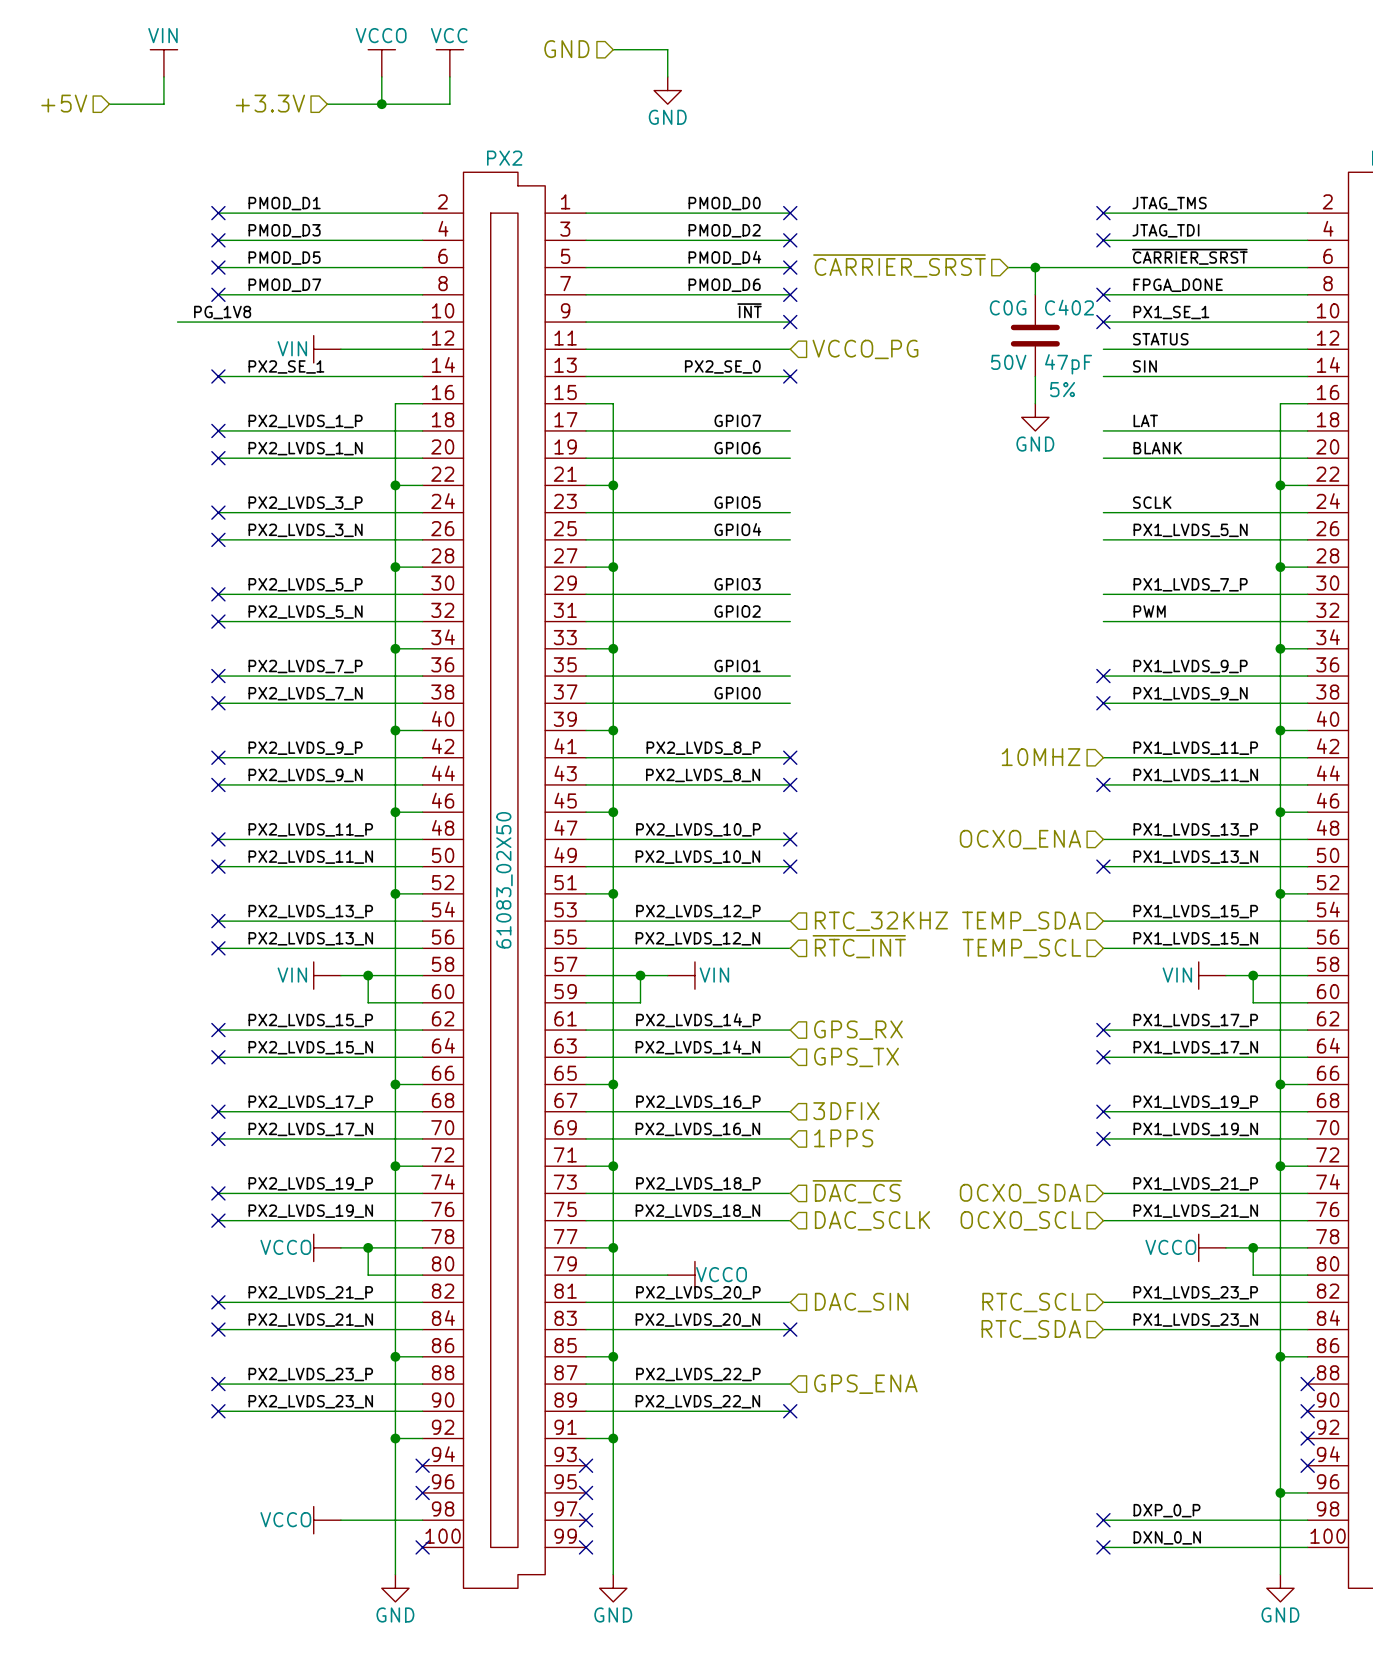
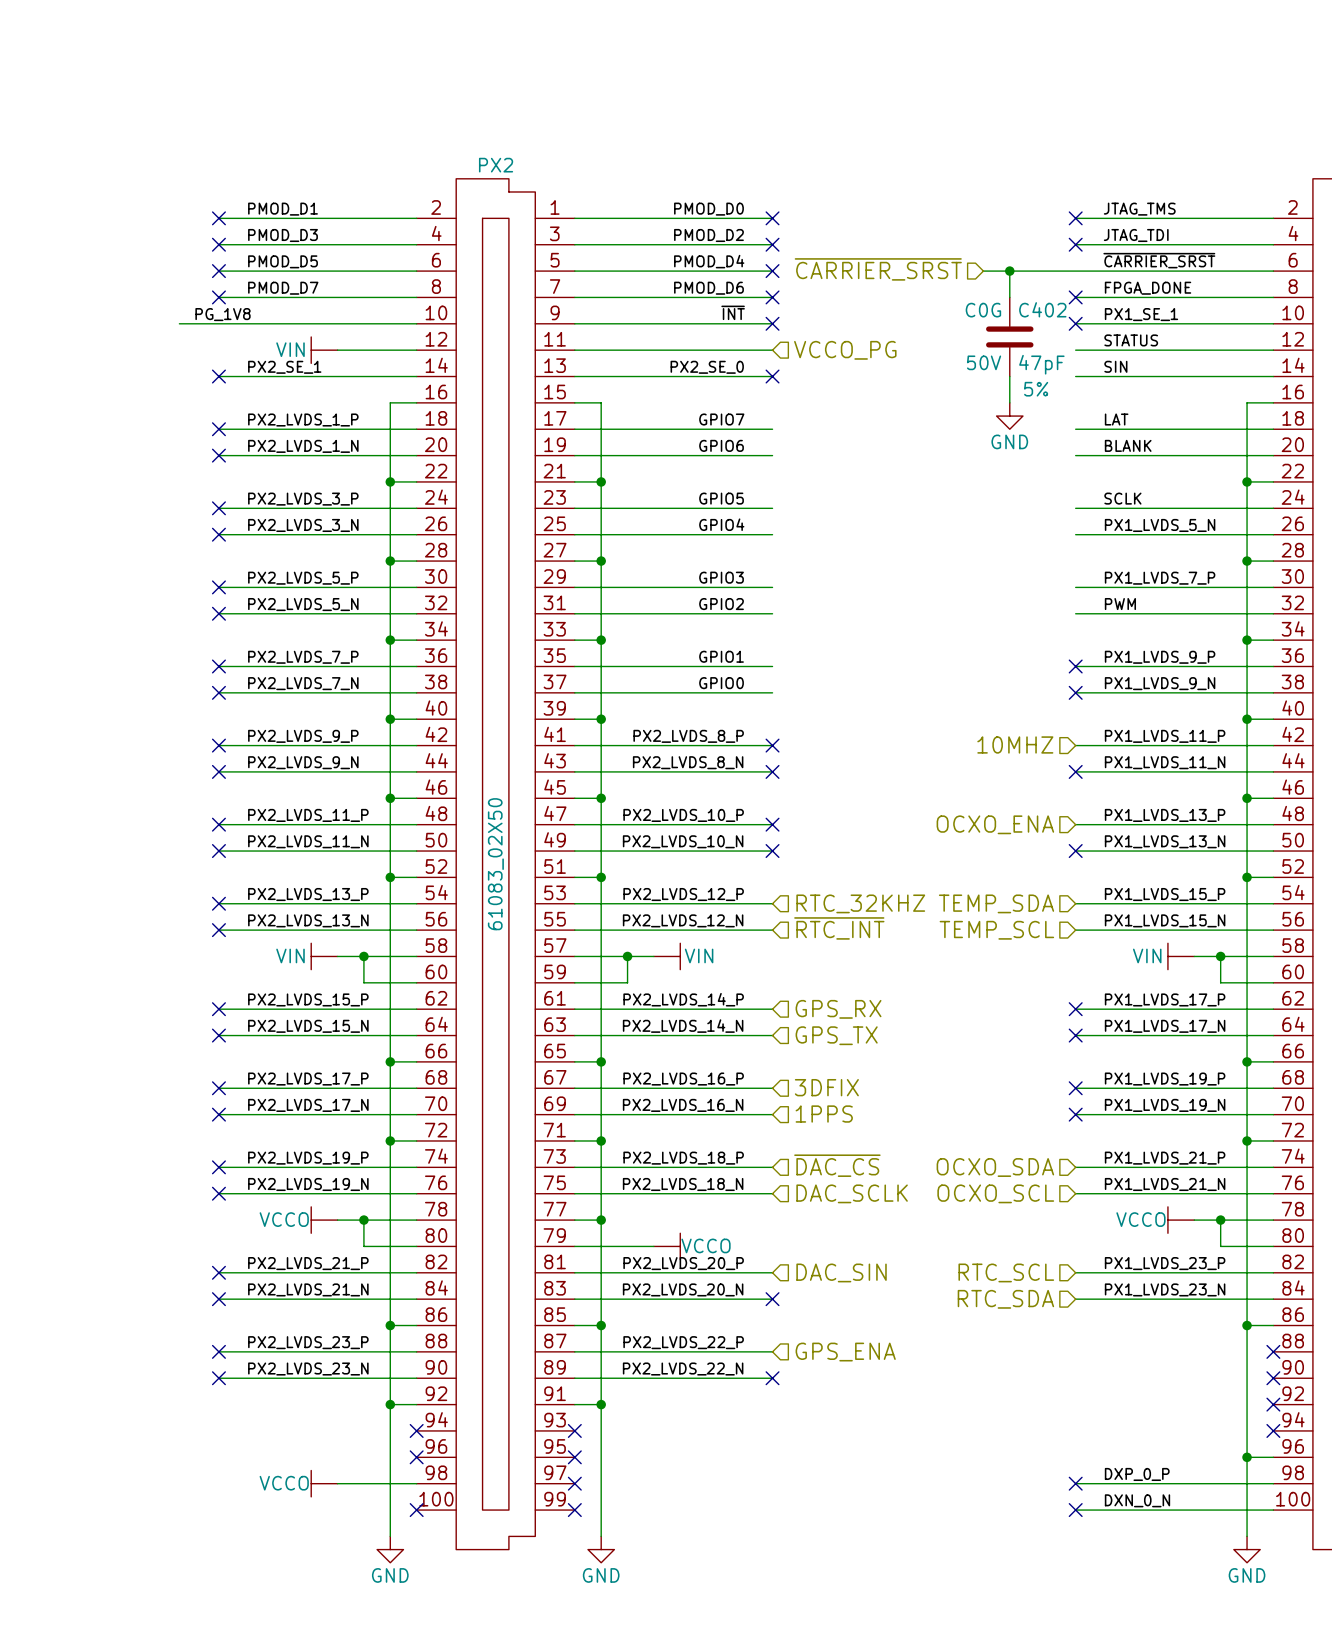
hierarchical label: GND (566, 49) -> none
wire: (613, 49) (667, 49) (667, 76) -> none
power symbol: VIN (163, 63) -> none
power symbol: VCCO (381, 63) -> none
power symbol: VCC (449, 63) -> none
wire: (163, 76) (163, 104) (109, 104) -> none
wire: (381, 76) (381, 104) -> none
wire: (449, 76) (449, 104) (327, 104) -> none
power symbol: GND (667, 90) -> none
hierarchical label: +5V (64, 103) -> none
hierarchical label: +3.3V (270, 103) -> none
junction: (381, 104) -> none

